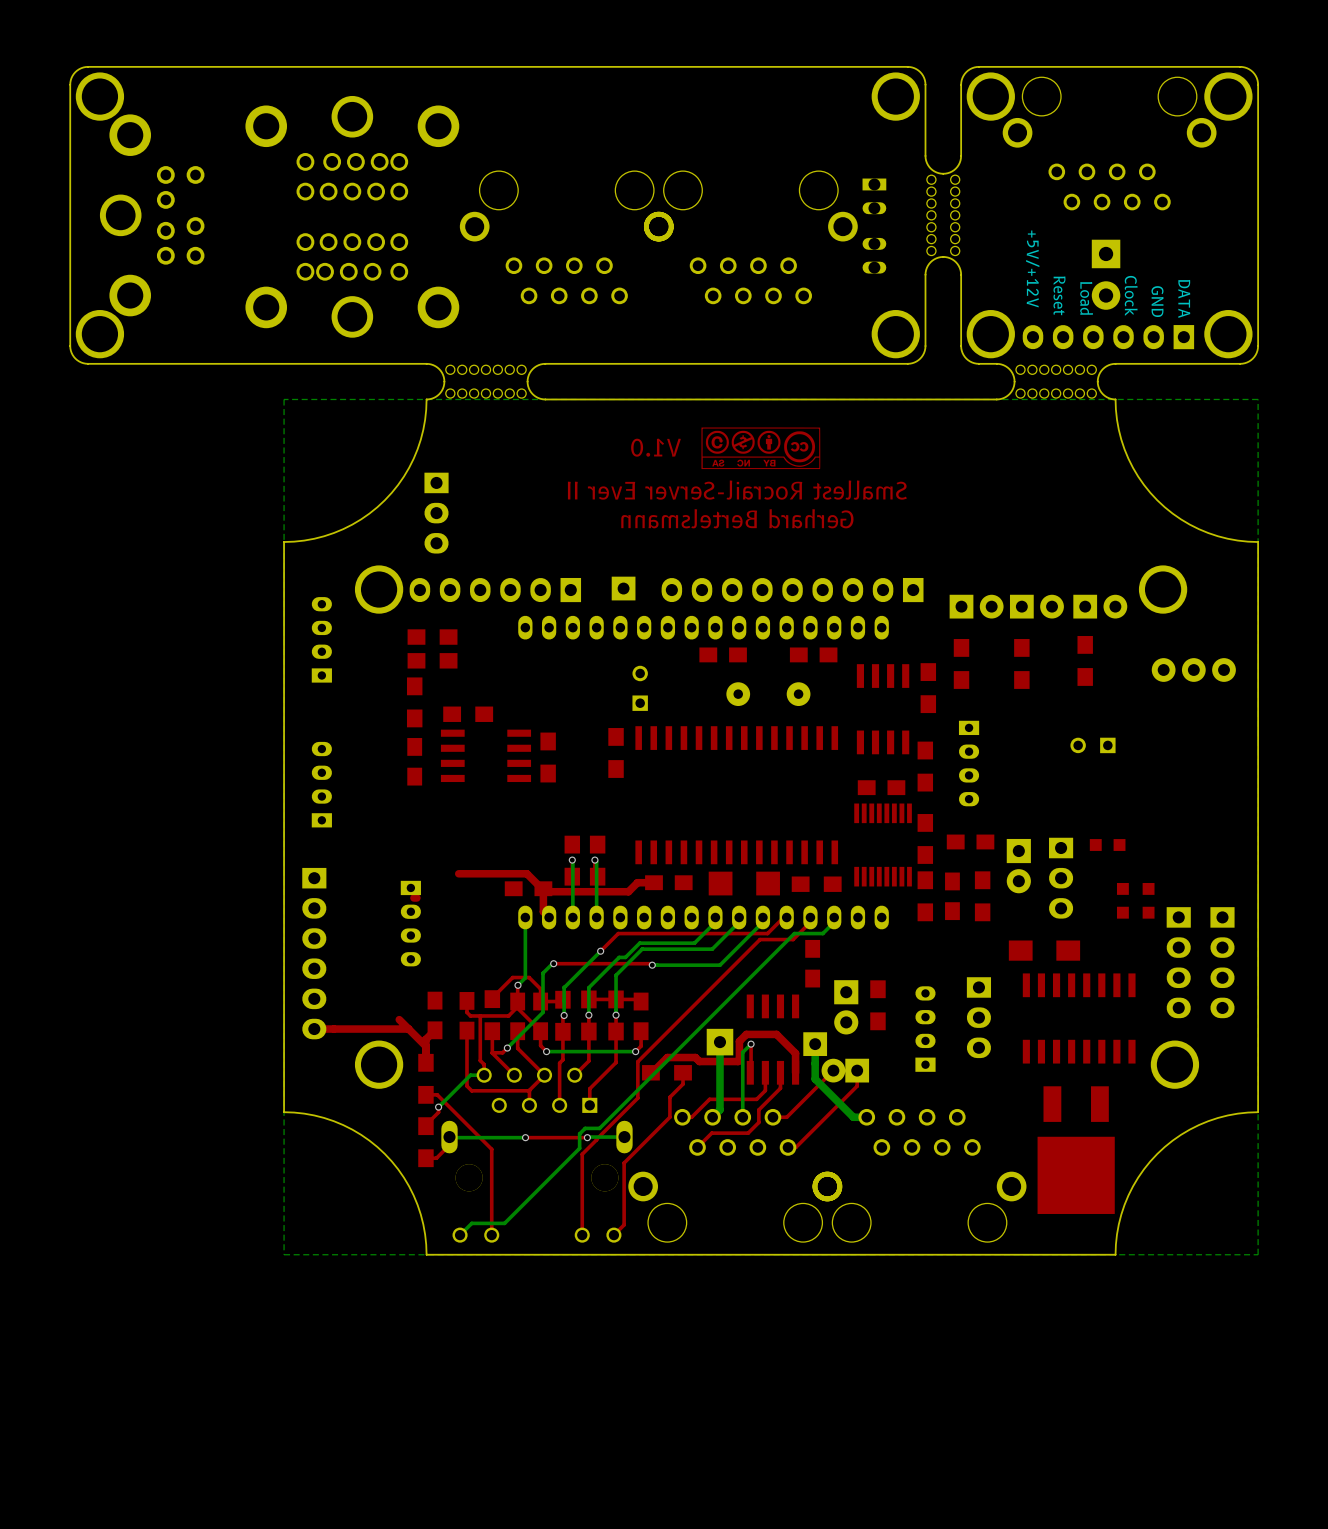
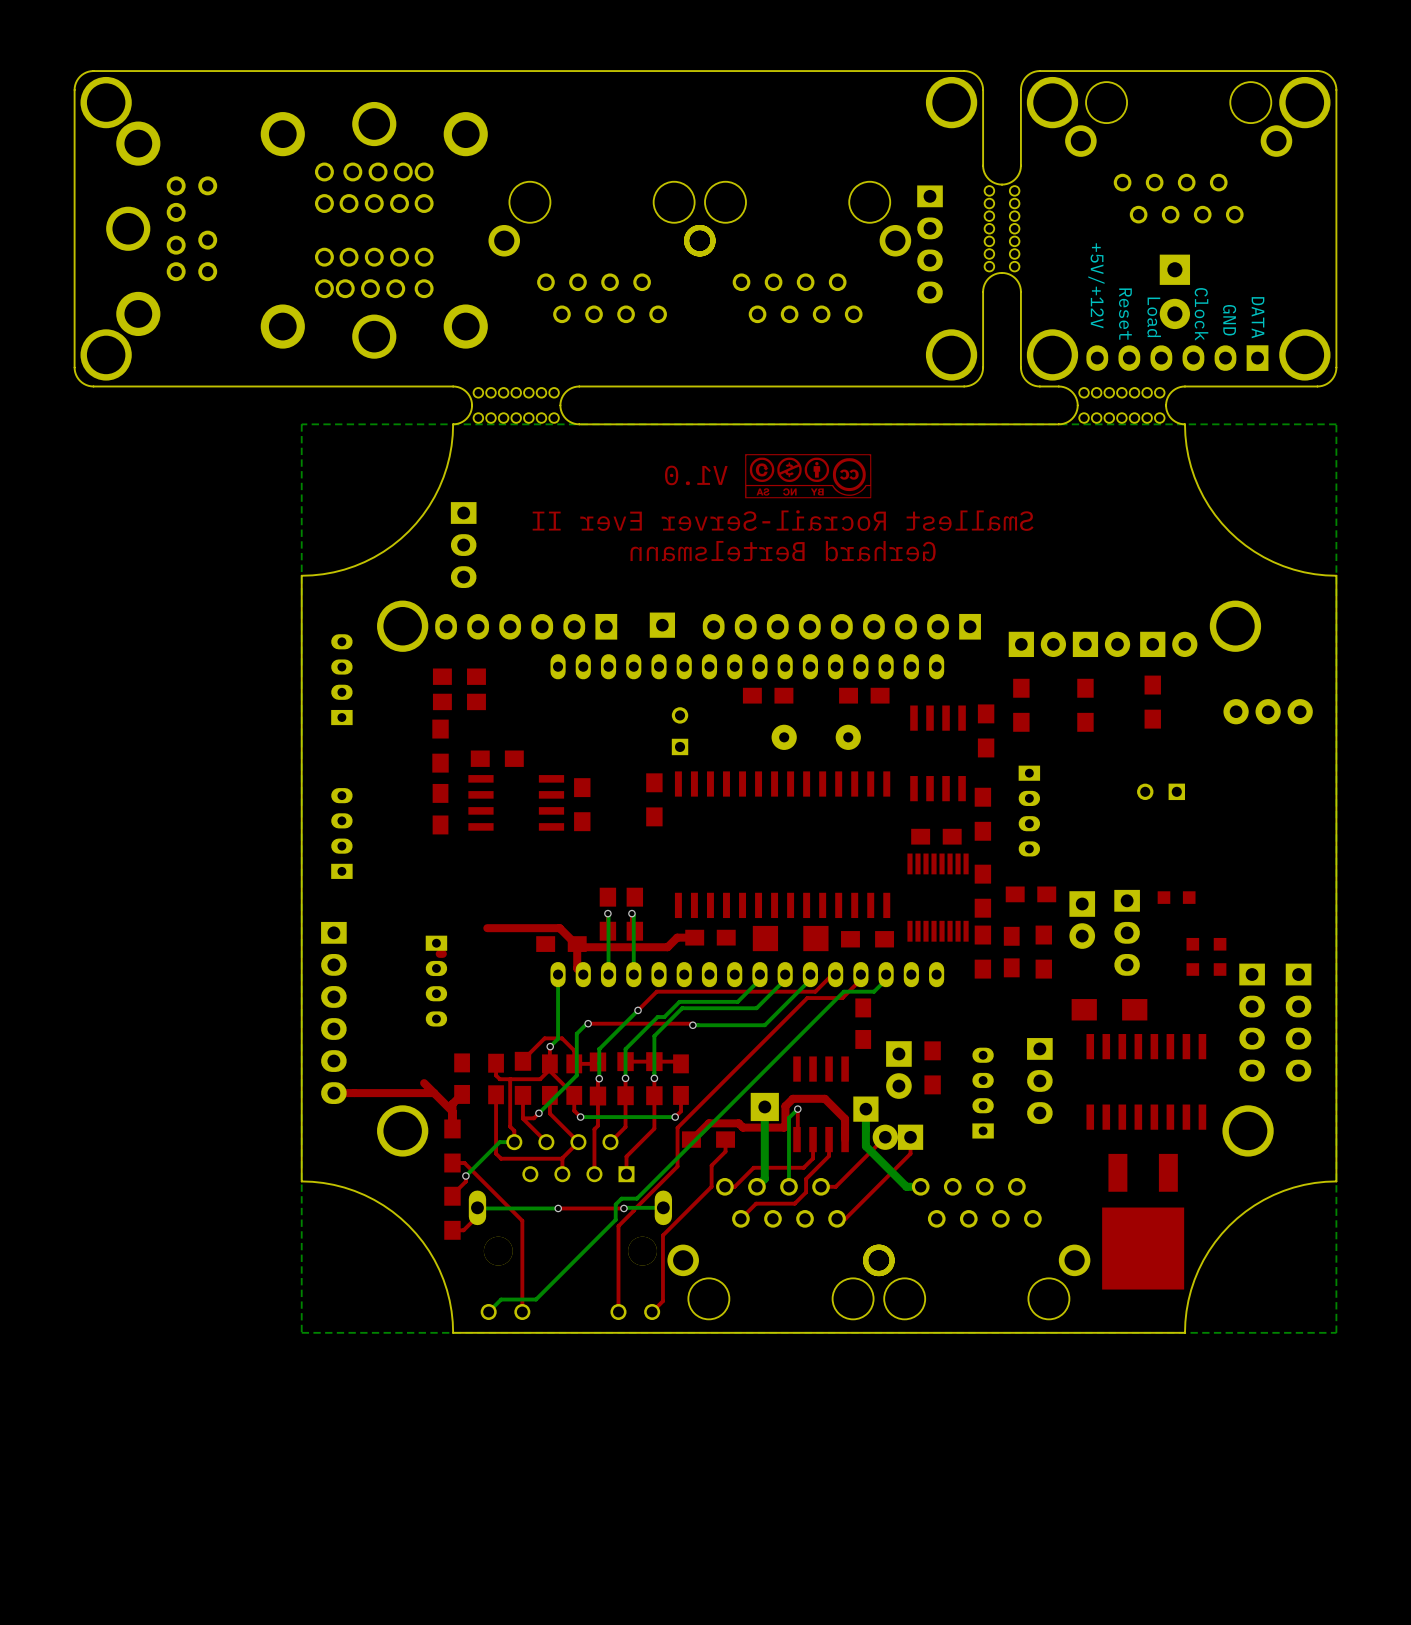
part footprint: [862, 178, 887, 274] -> [917, 185, 943, 304]

